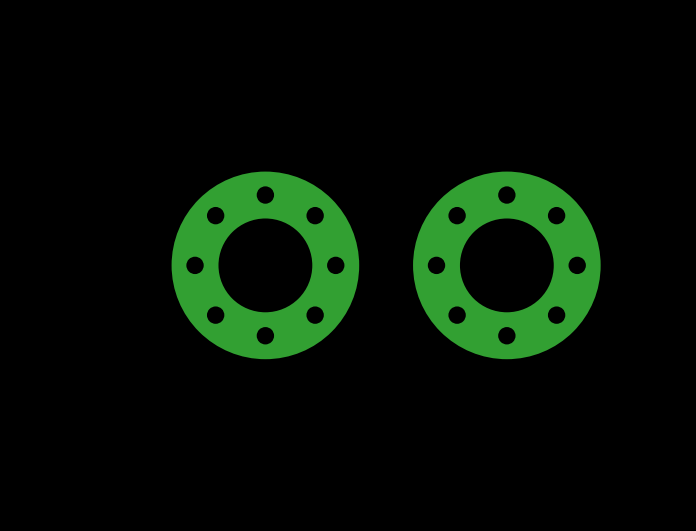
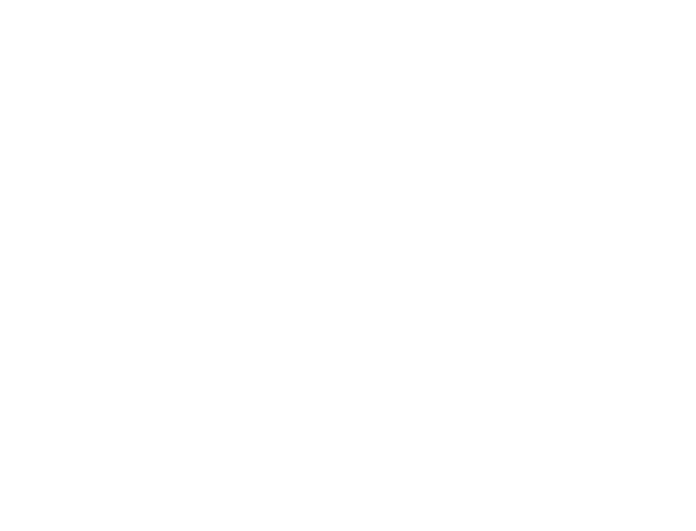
part: (265, 265) -> none
part: (506, 265) -> none

